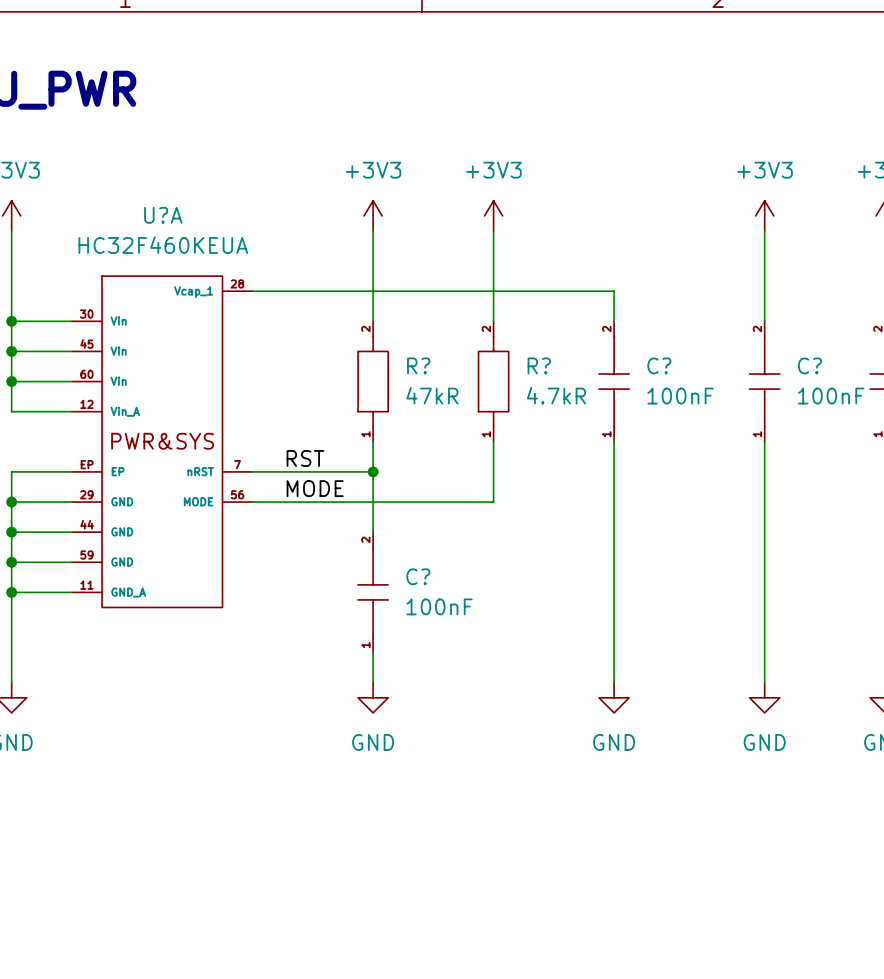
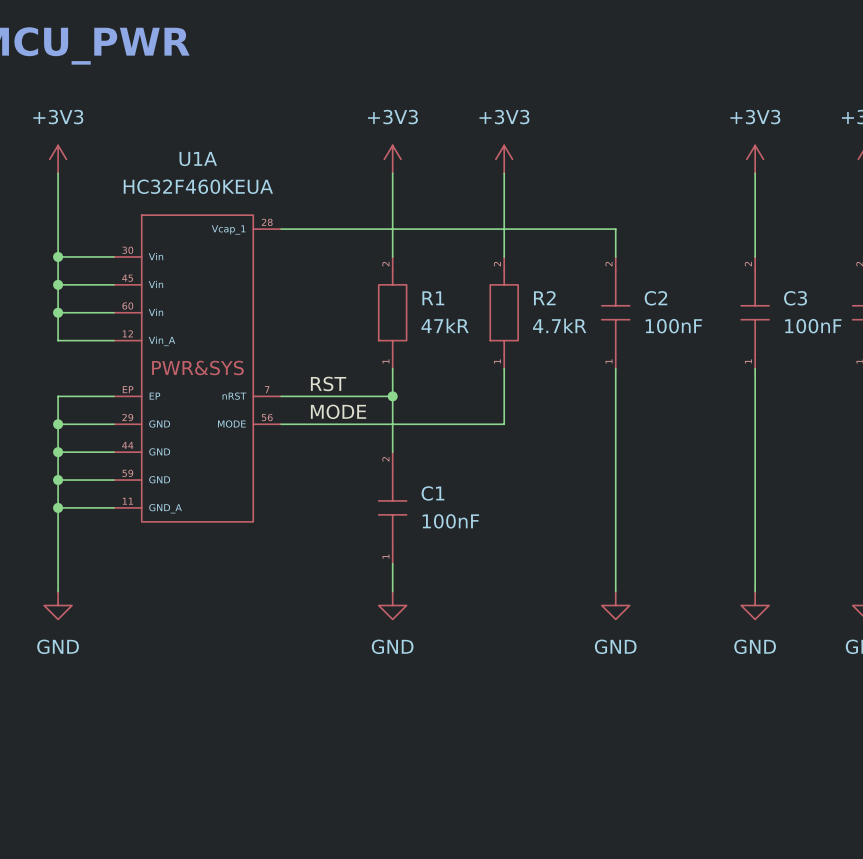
U?A name: U?A (163, 215) -> U1A (198, 159)
R? name: R? (418, 365) -> R1 (433, 298)
R? name: R? (539, 365) -> R2 (544, 298)
C? name: C? (659, 365) -> C2 (655, 298)
C? name: C? (809, 365) -> C3 (795, 298)
C? name: C? (418, 576) -> C1 (432, 493)

